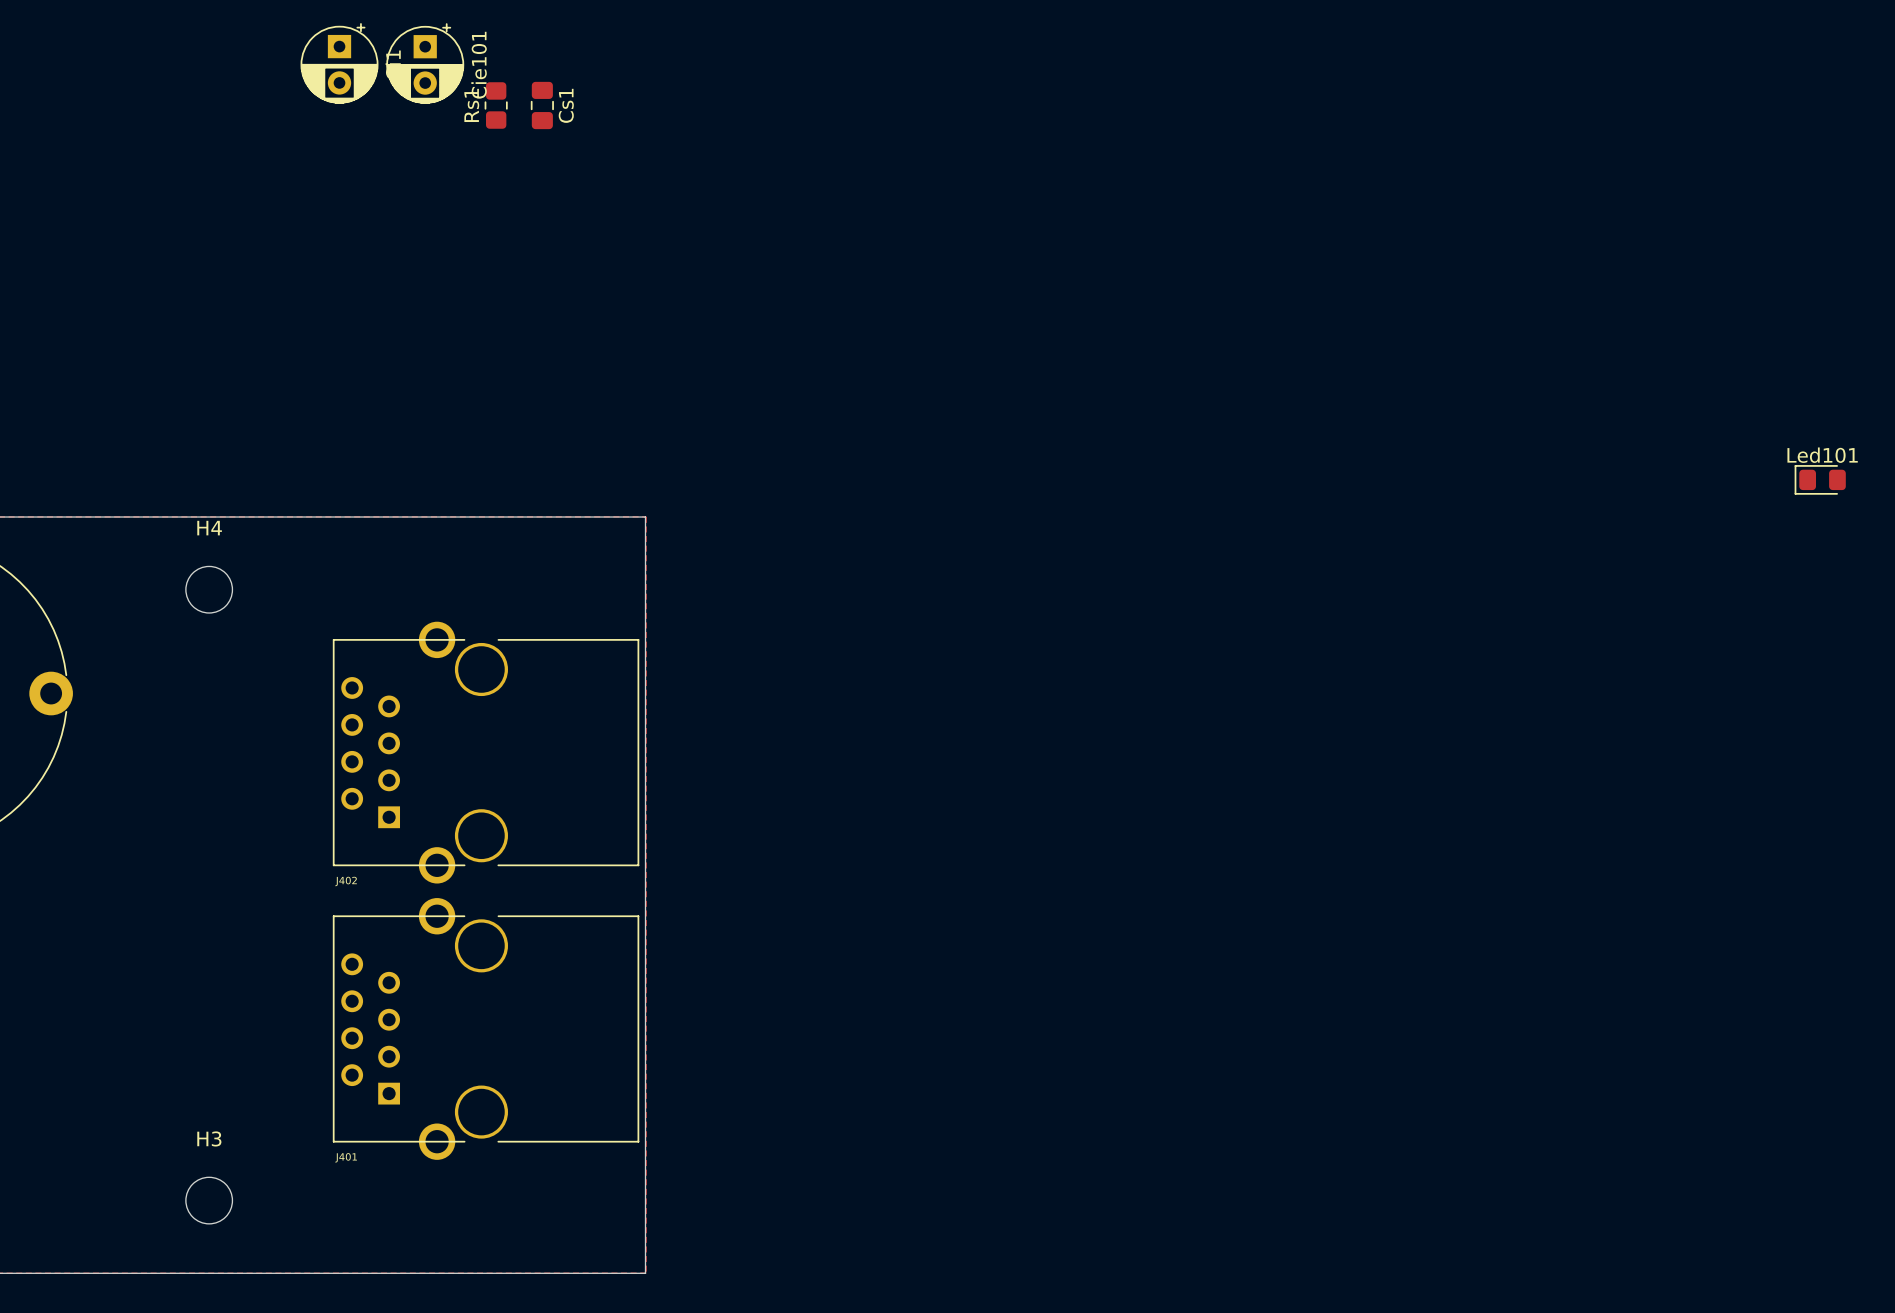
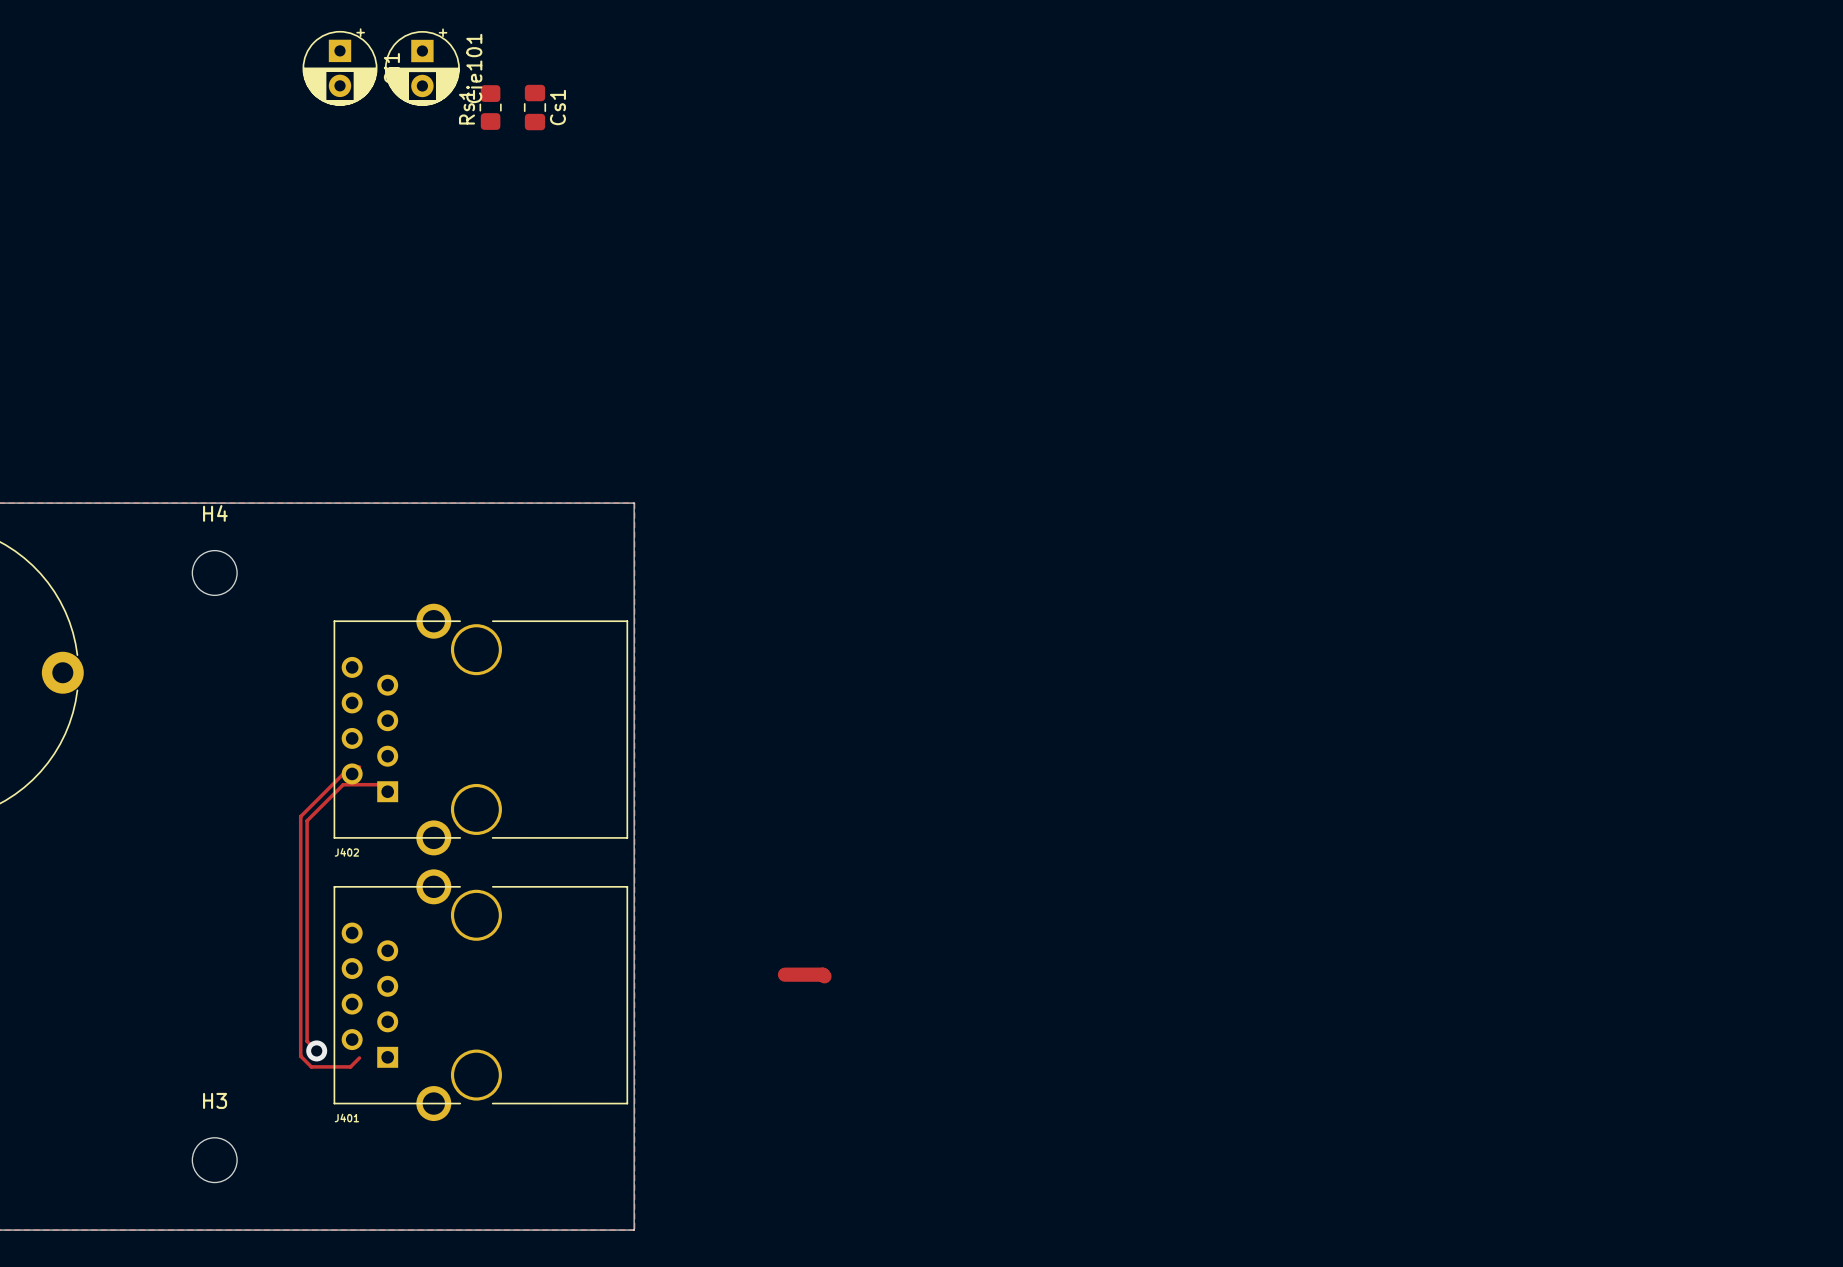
Led101: (1820, 479) -> none
track: none -> (359, 766) (350, 766) (300, 816) (300, 1056) (311, 1066) (350, 1066) (359, 1058)
track: none -> (394, 784) (343, 784) (307, 820) (307, 1041) (316, 1050)
track: none -> (785, 975) (822, 974) (824, 976)
via: none -> (316, 1050)

